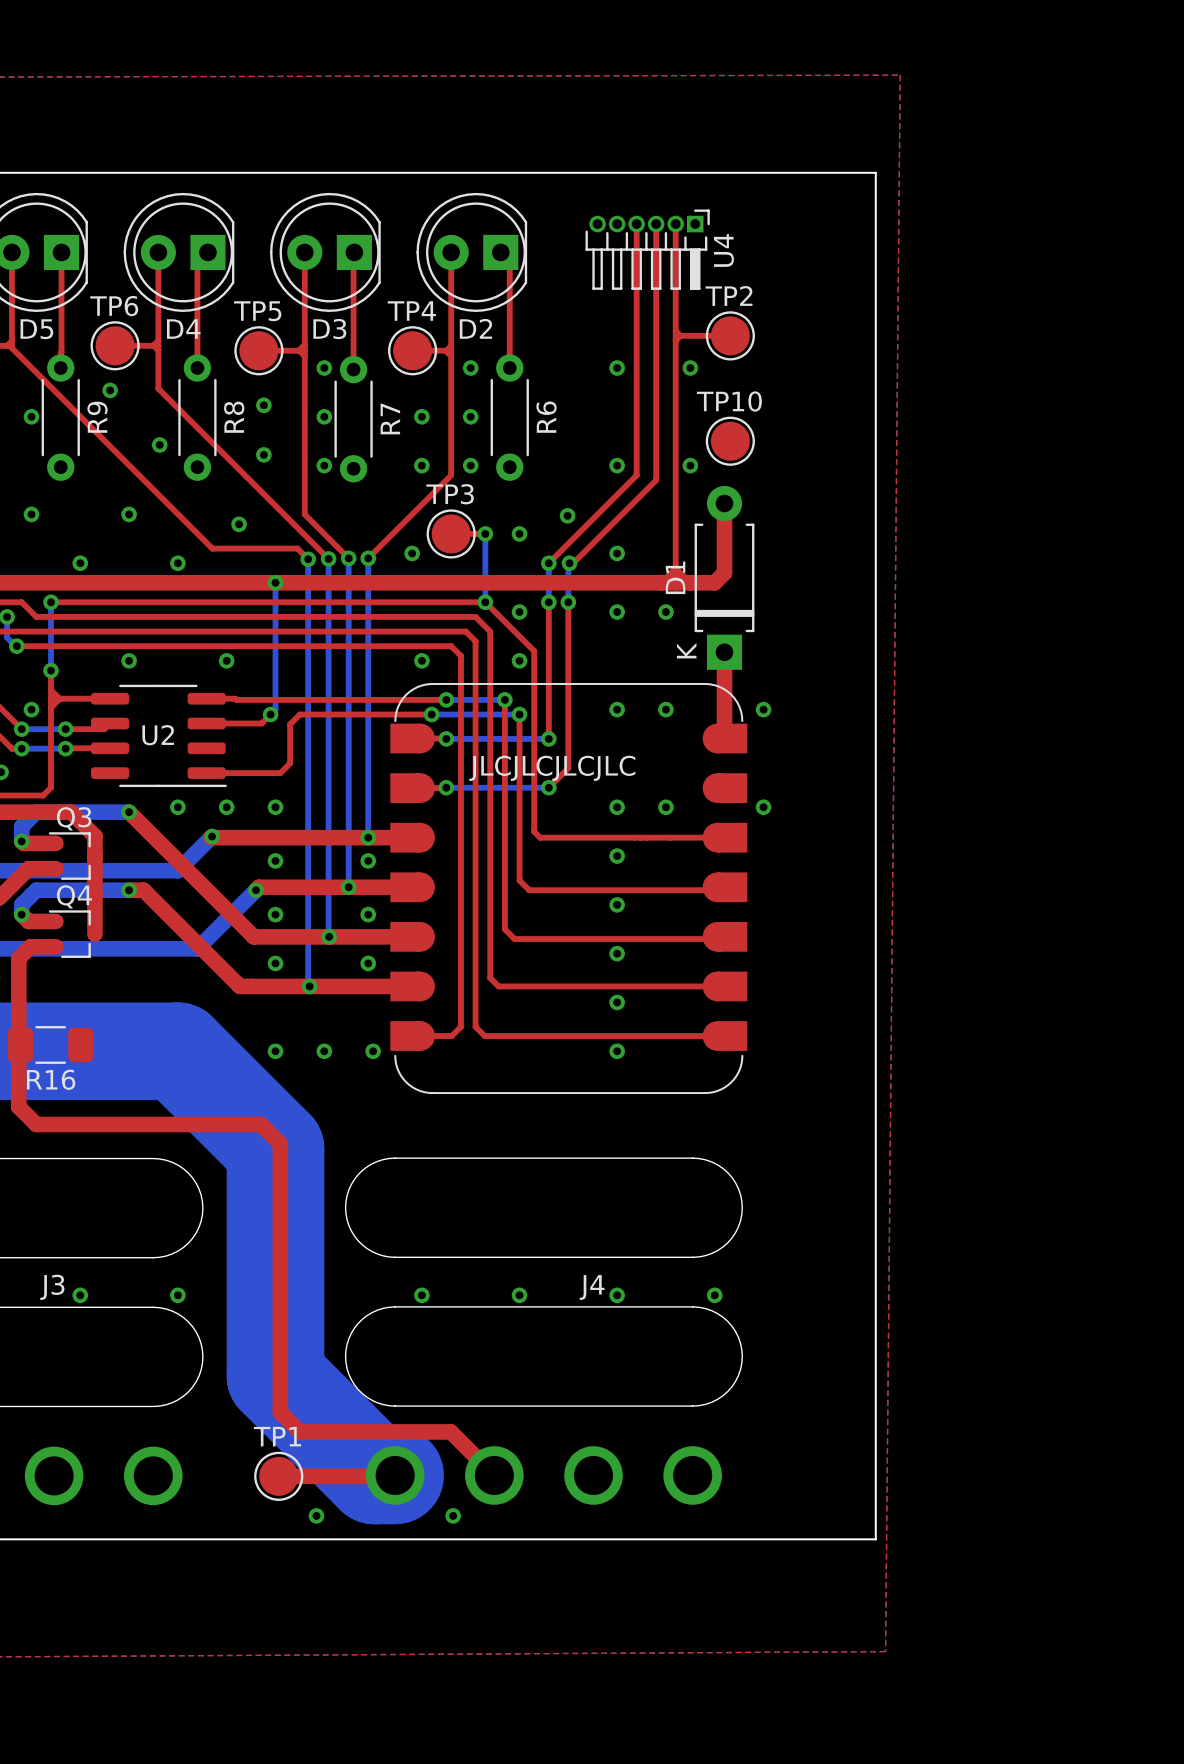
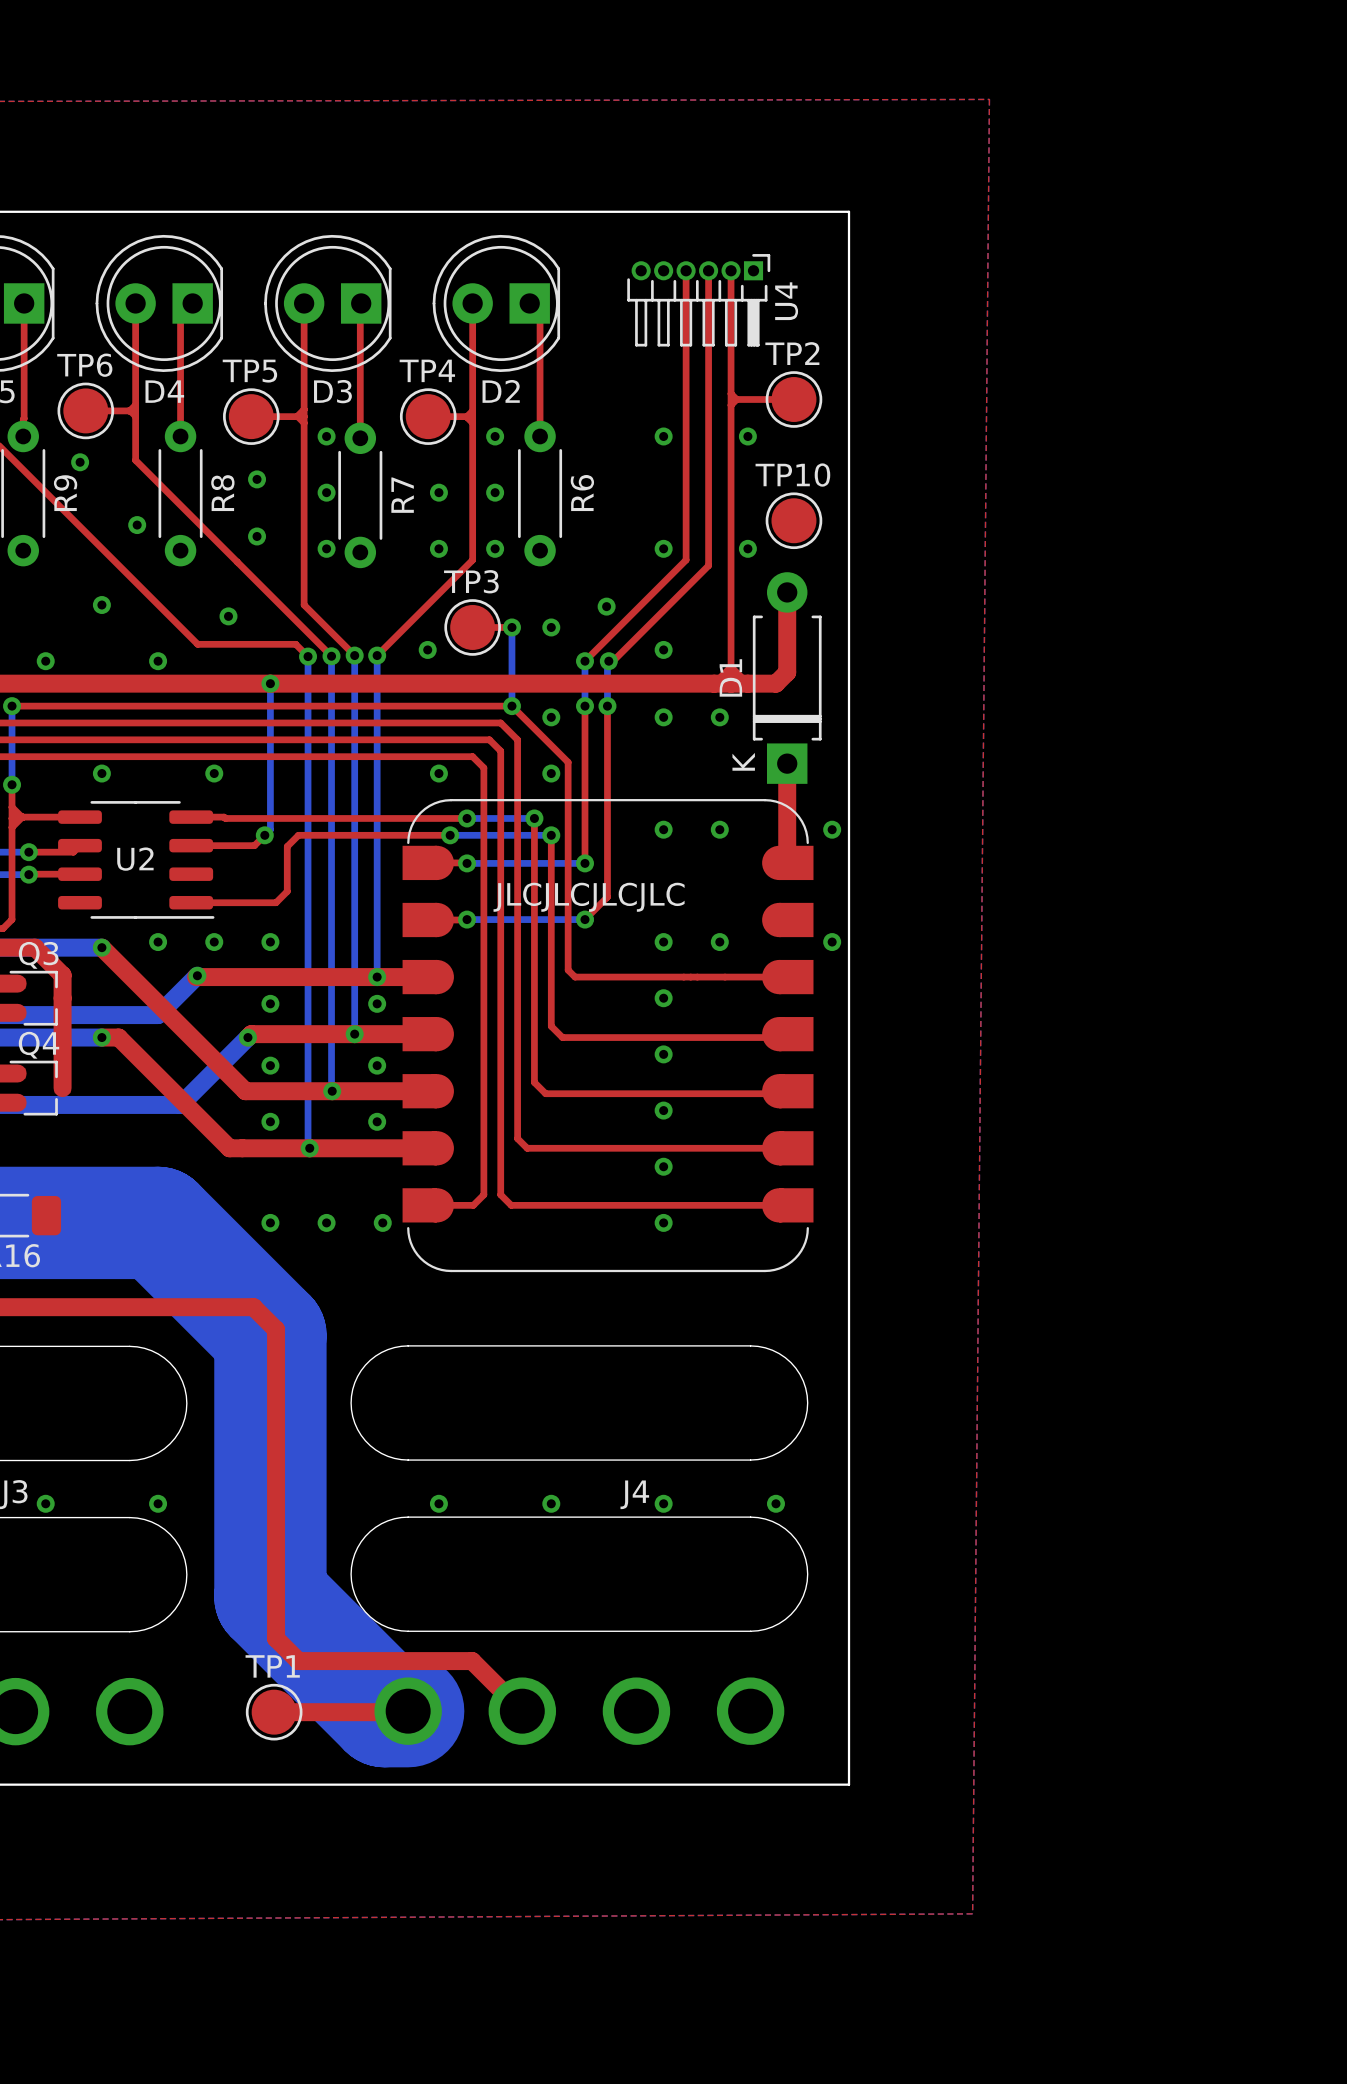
board edge: (778, 172) (875, 172) (875, 1539) (778, 1539) -> (849, 211) (849, 1784)
via: (316, 1515) -> none
via: (453, 1515) -> none

